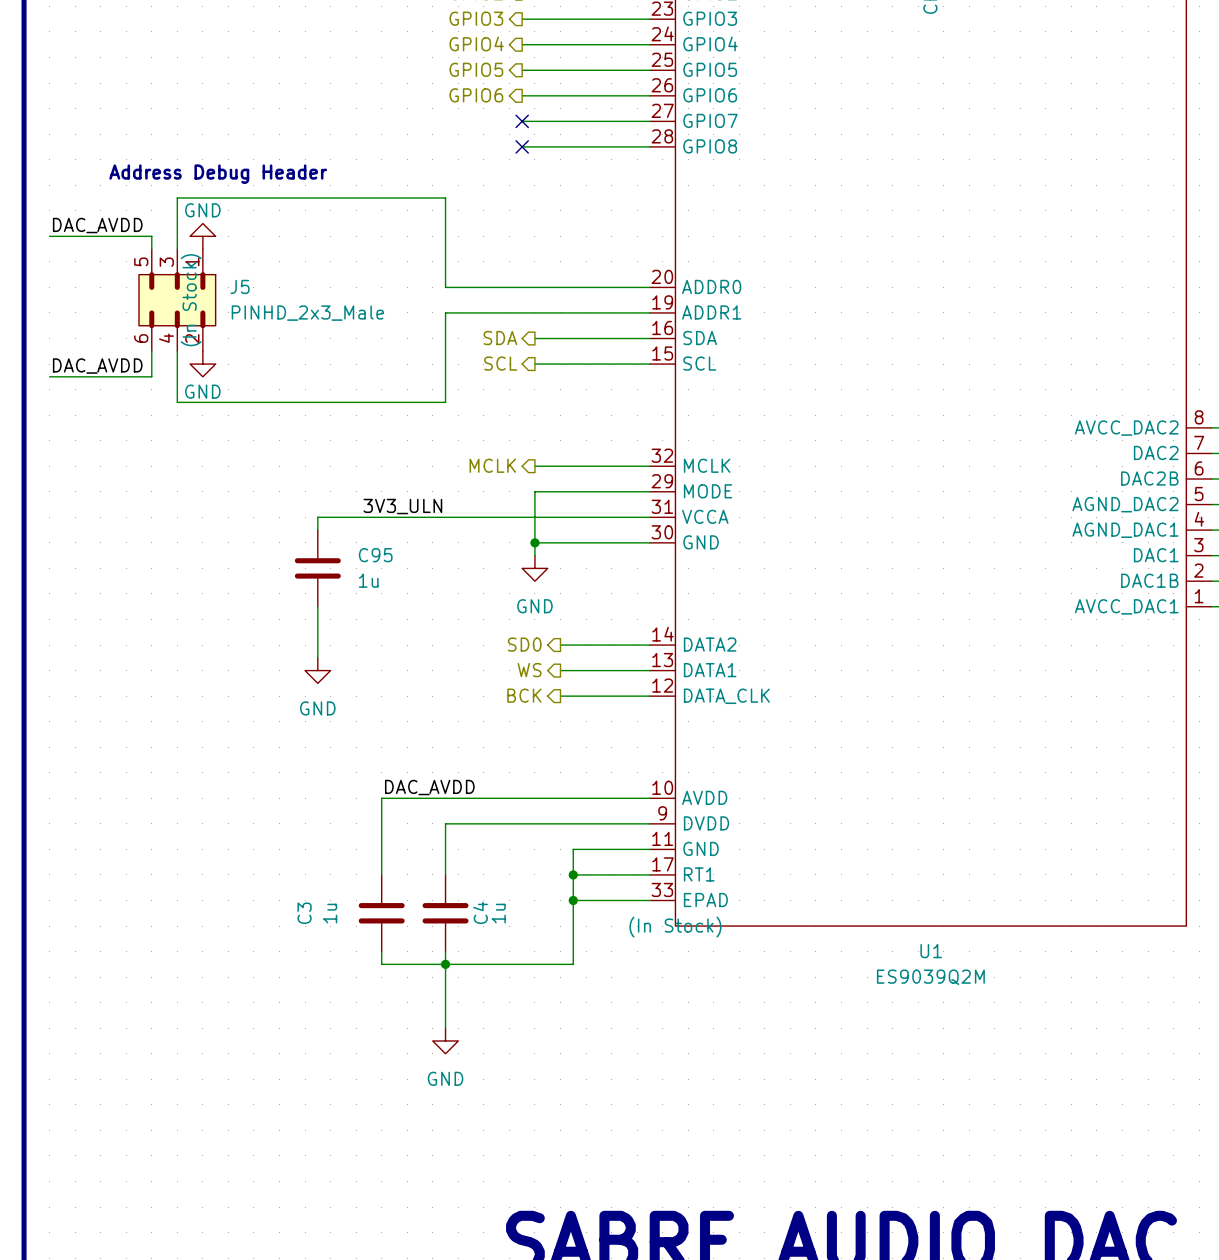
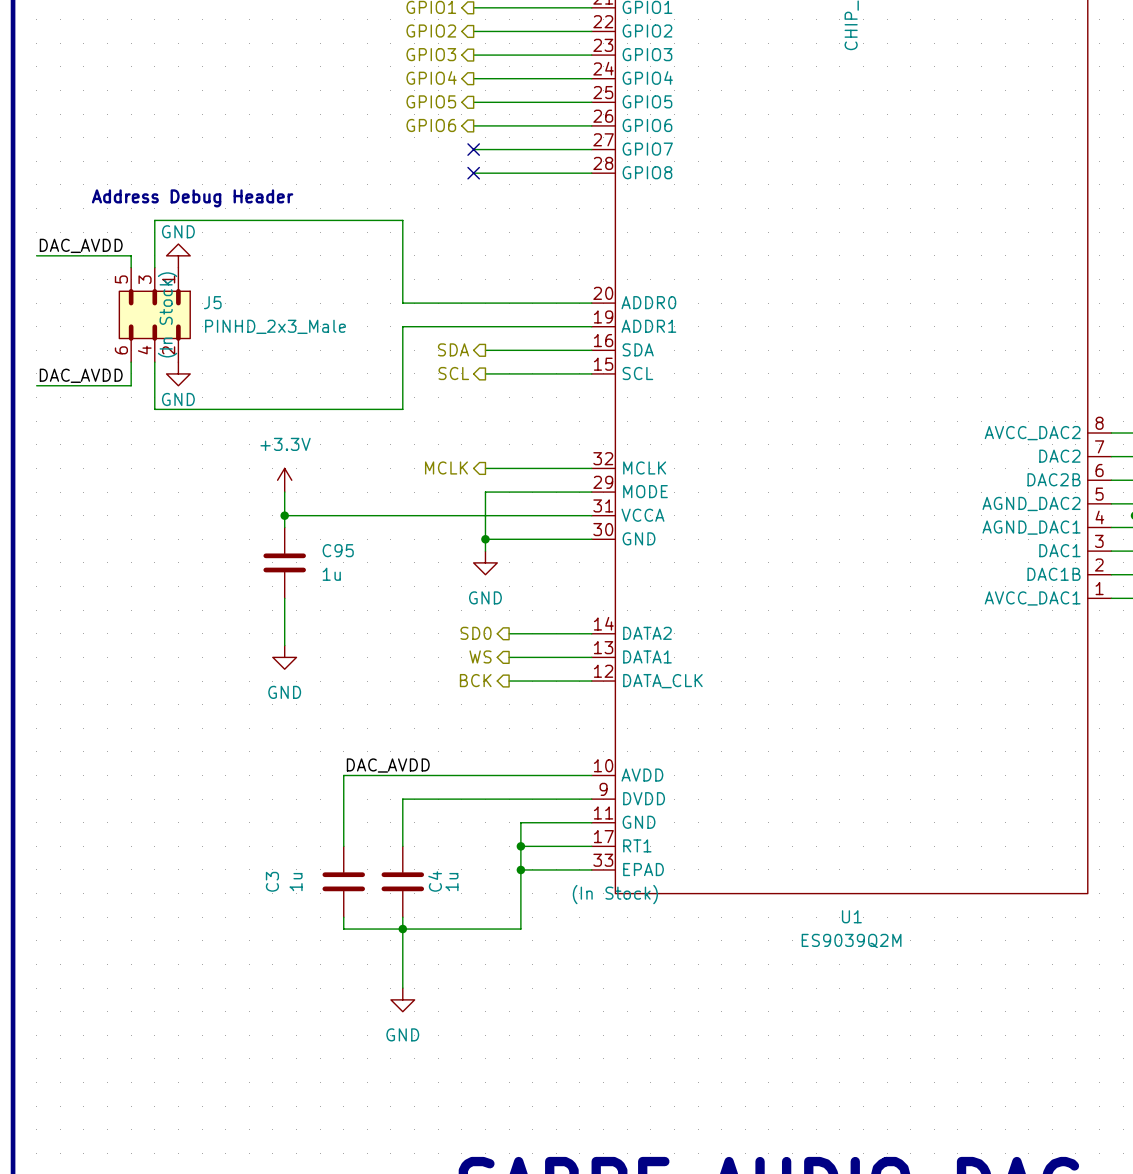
power symbol: none -> +3.3V (284, 480)
wire: none -> (284, 492) (284, 515)
label: 3V3_ULN (402, 506) -> none
junction: none -> (284, 515)

